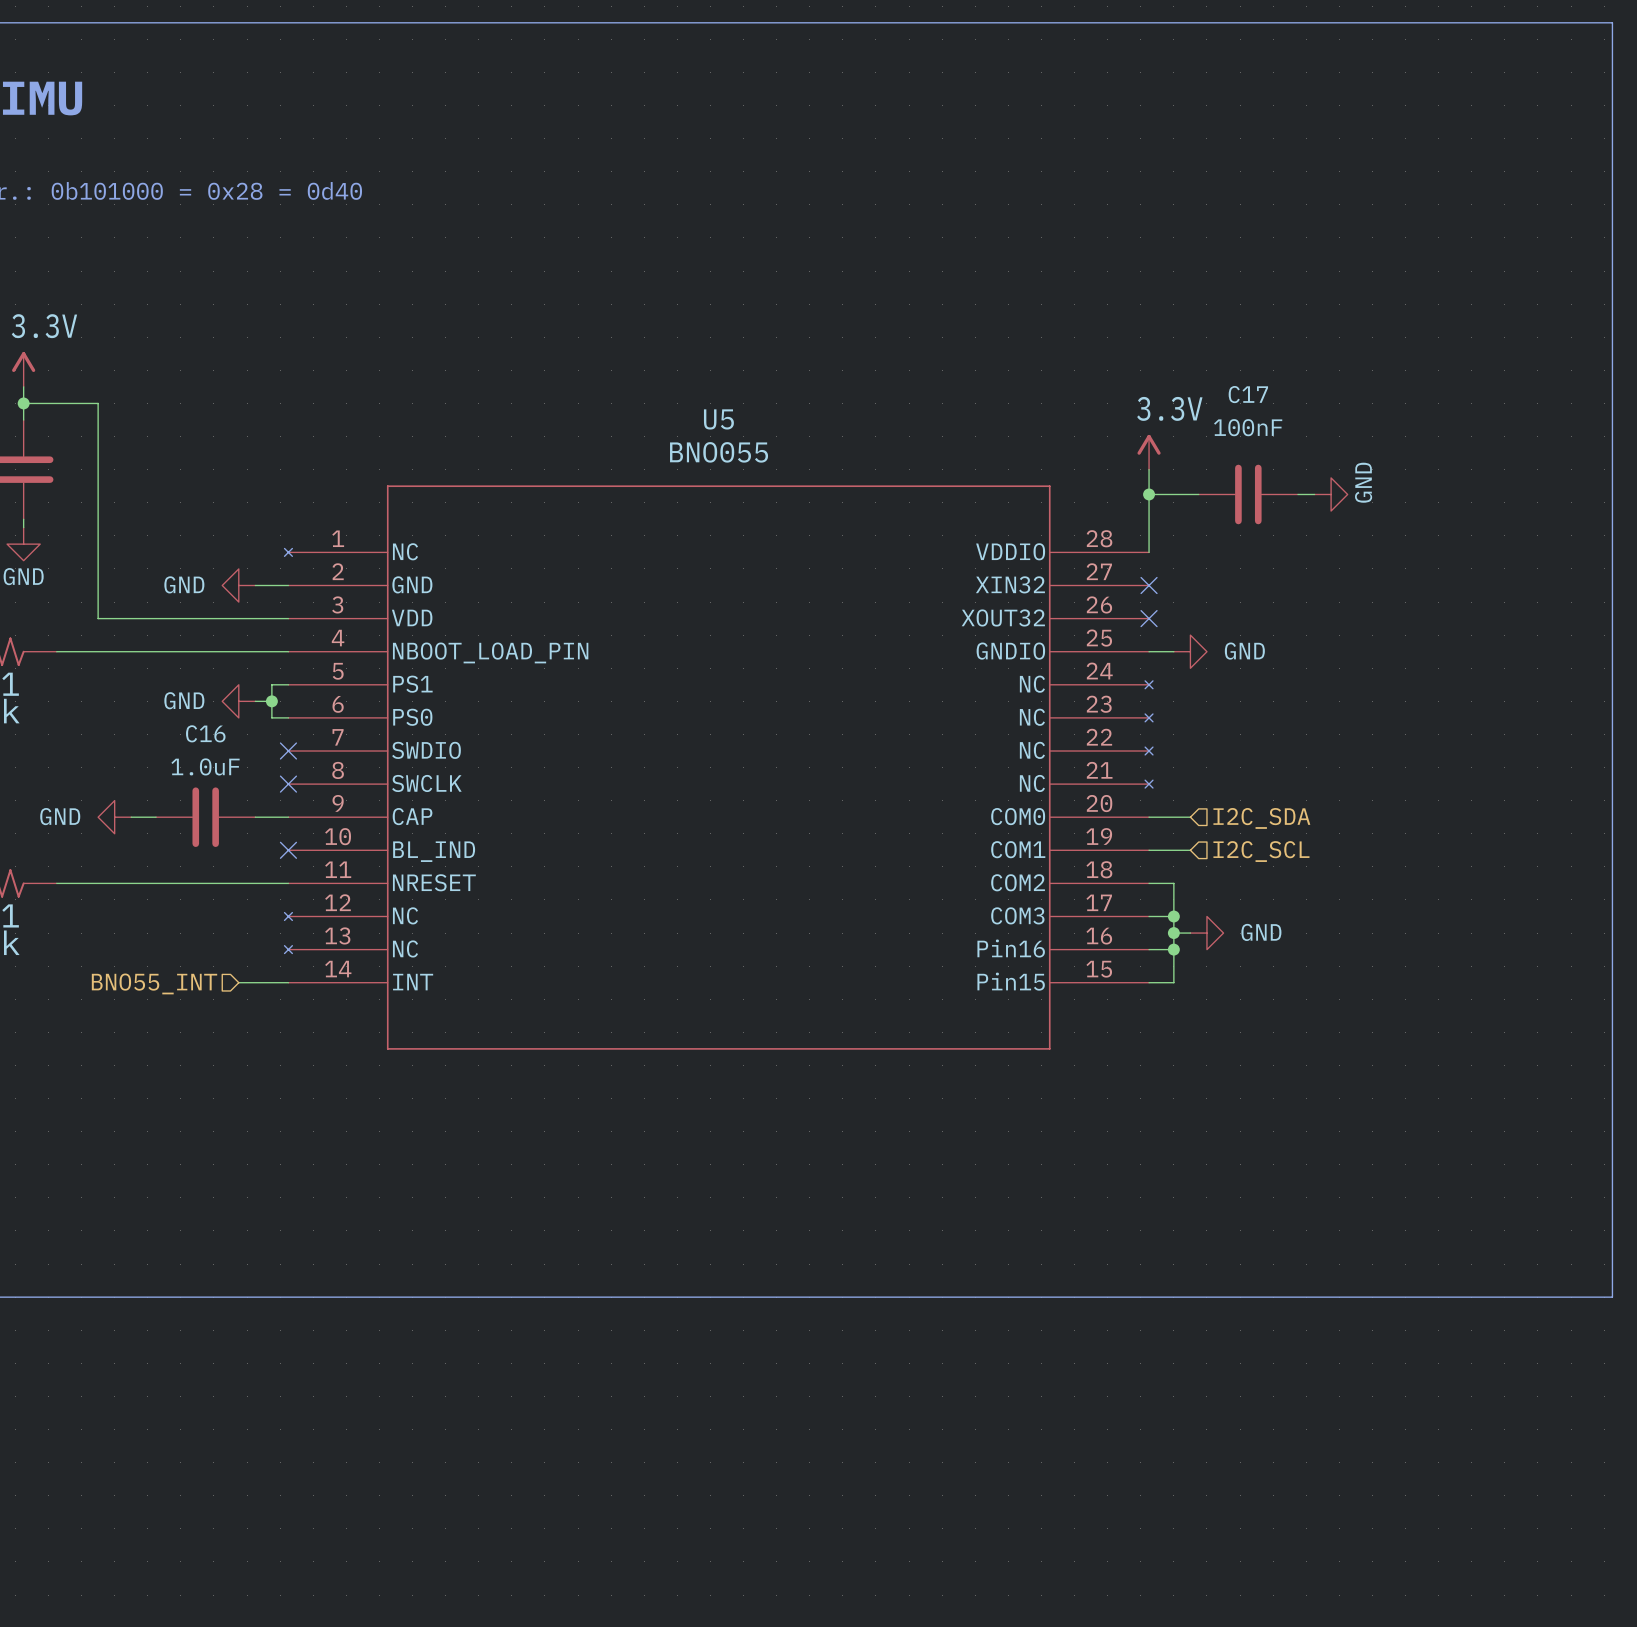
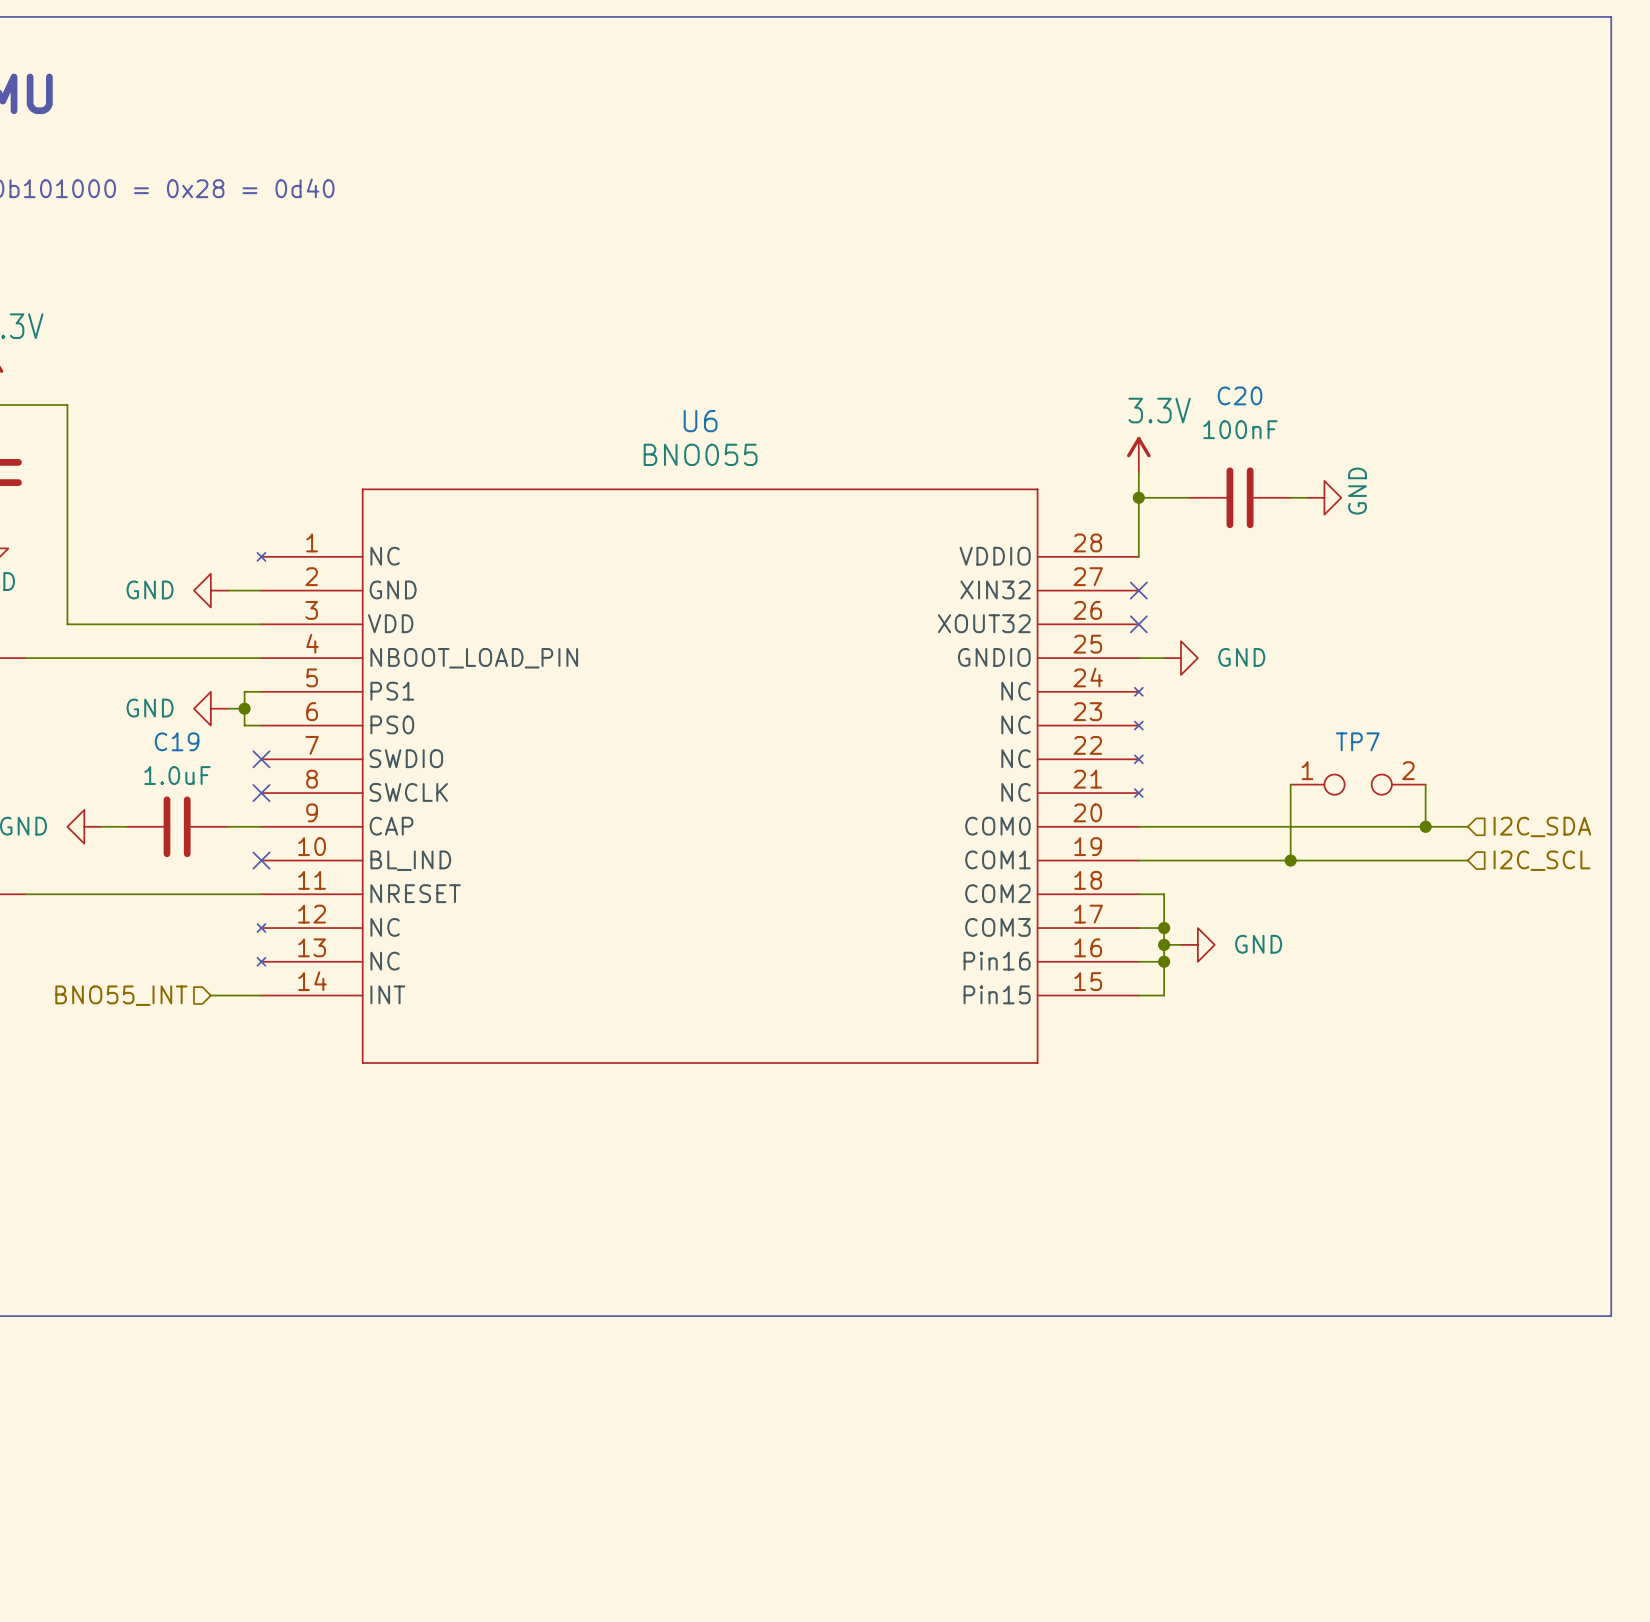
C17 name: C17 (1248, 394) -> C20 (1240, 395)
U5 name: U5 (718, 419) -> U6 (700, 421)
C16 name: C16 (205, 733) -> C19 (177, 741)
wire: none -> (1290, 784) (1290, 860)
TP7: none -> (1358, 784)
wire: none -> (1425, 784) (1425, 826)
wire: none -> (1180, 826) (1467, 826)
junction: none -> (1425, 826)
hierarchical label position: I2C_SDA (1261, 818) -> I2C_SDA (1542, 826)
wire: none -> (1180, 860) (1467, 860)
junction: none -> (1290, 860)
hierarchical label position: I2C_SCL (1261, 851) -> I2C_SCL (1542, 860)

